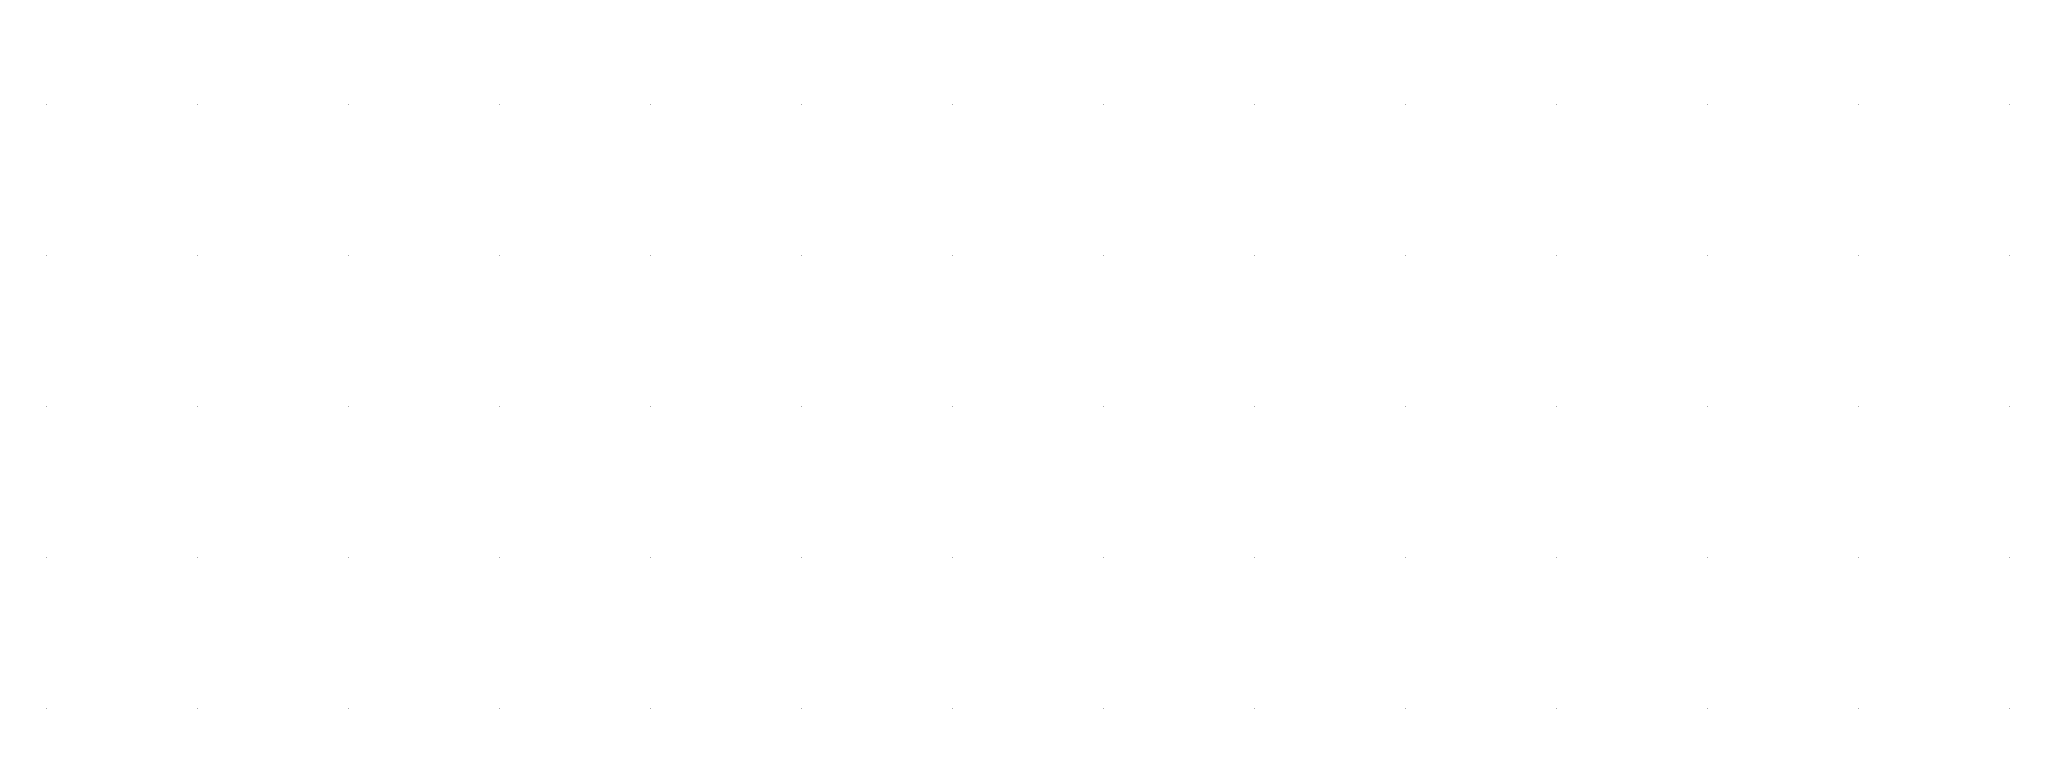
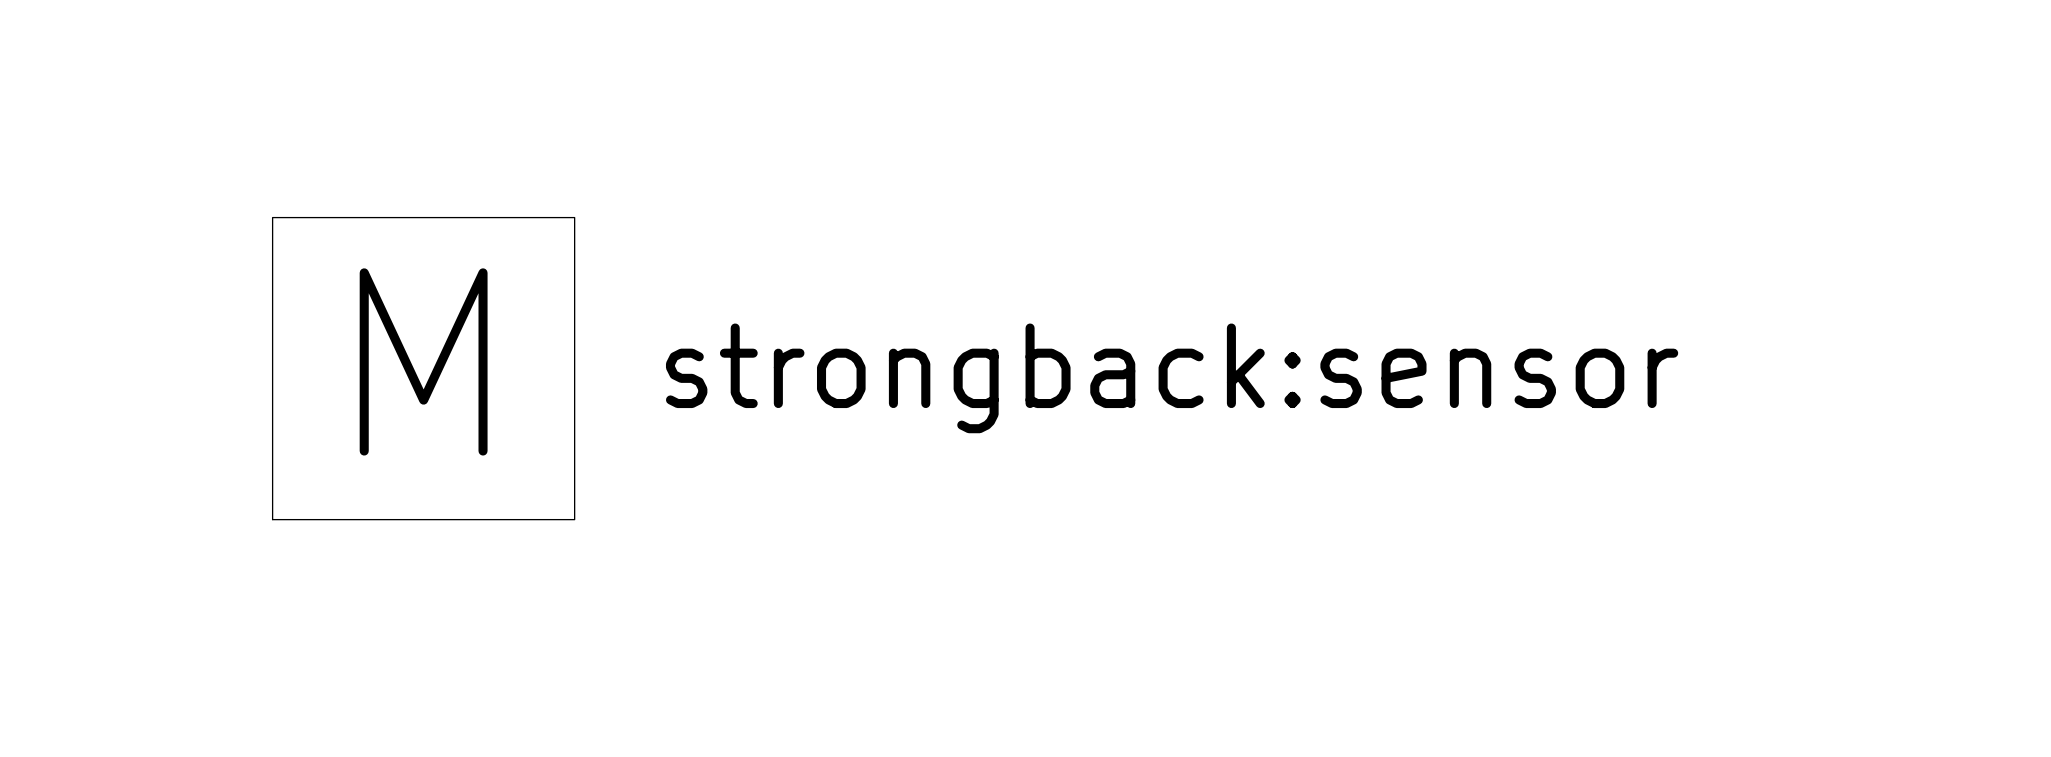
part: none -> strongback:sensor (423, 368)

